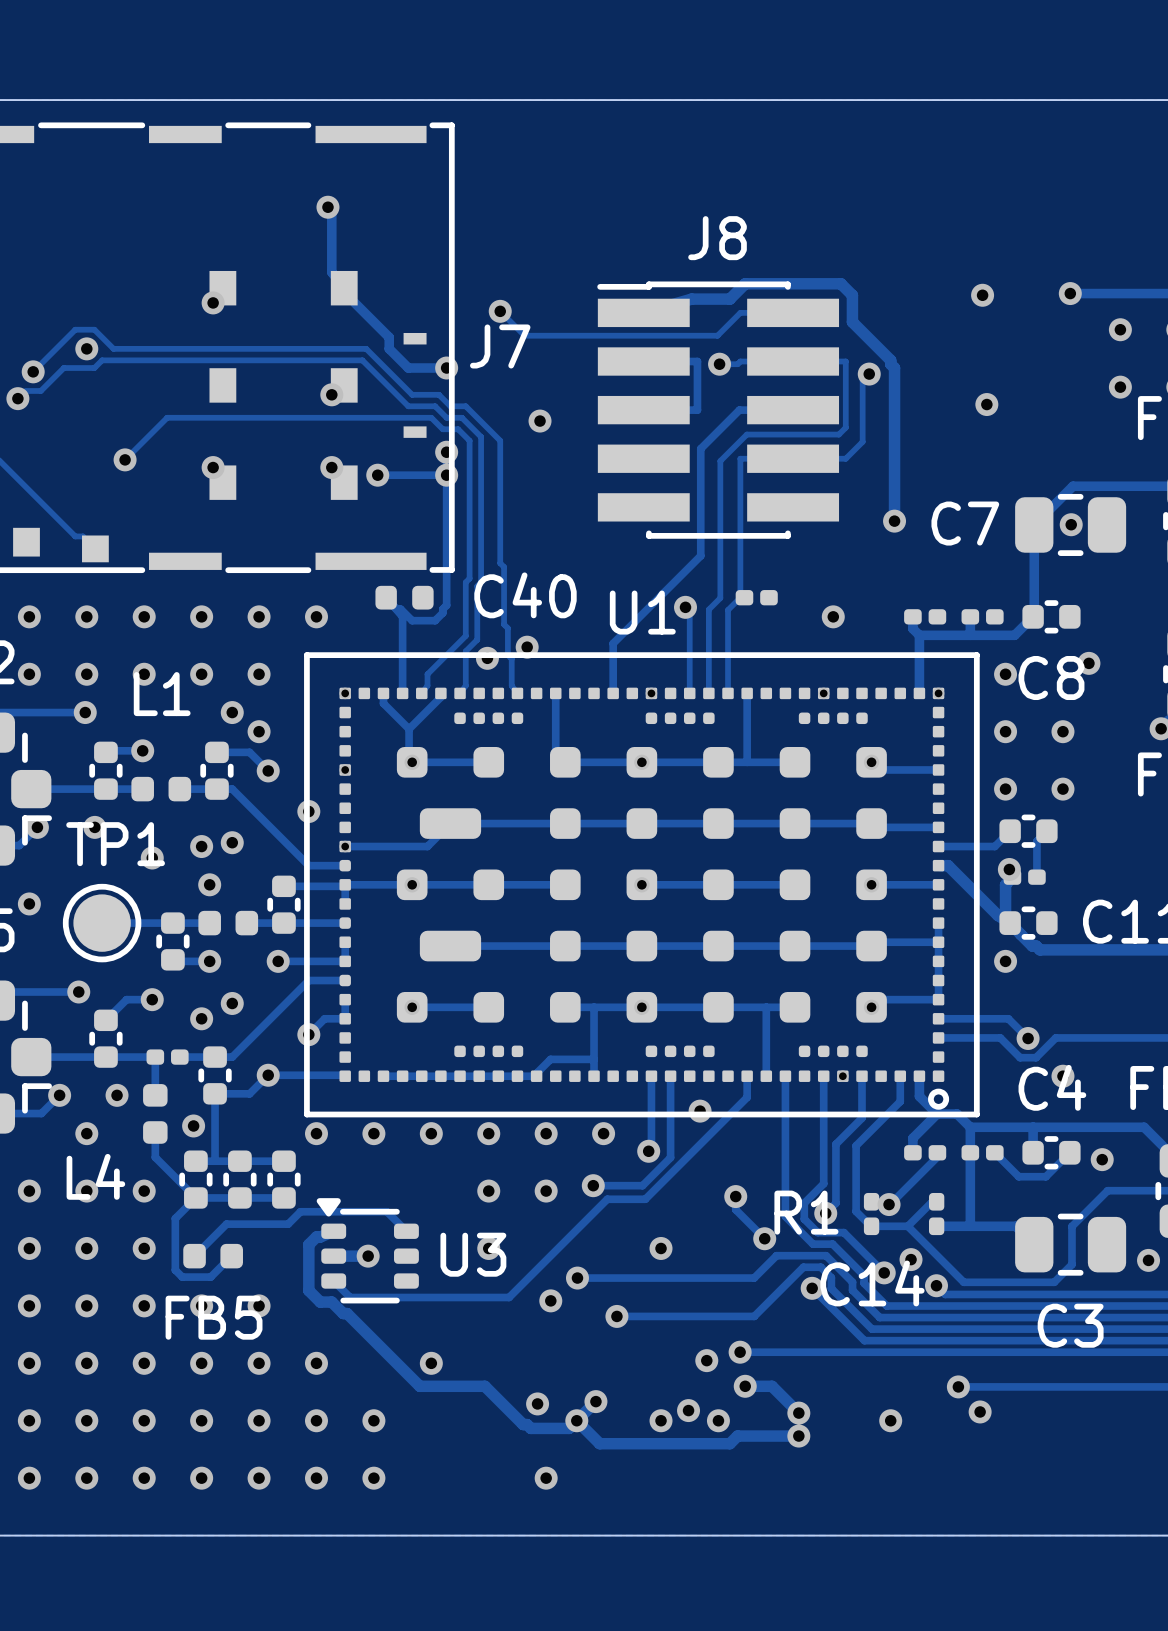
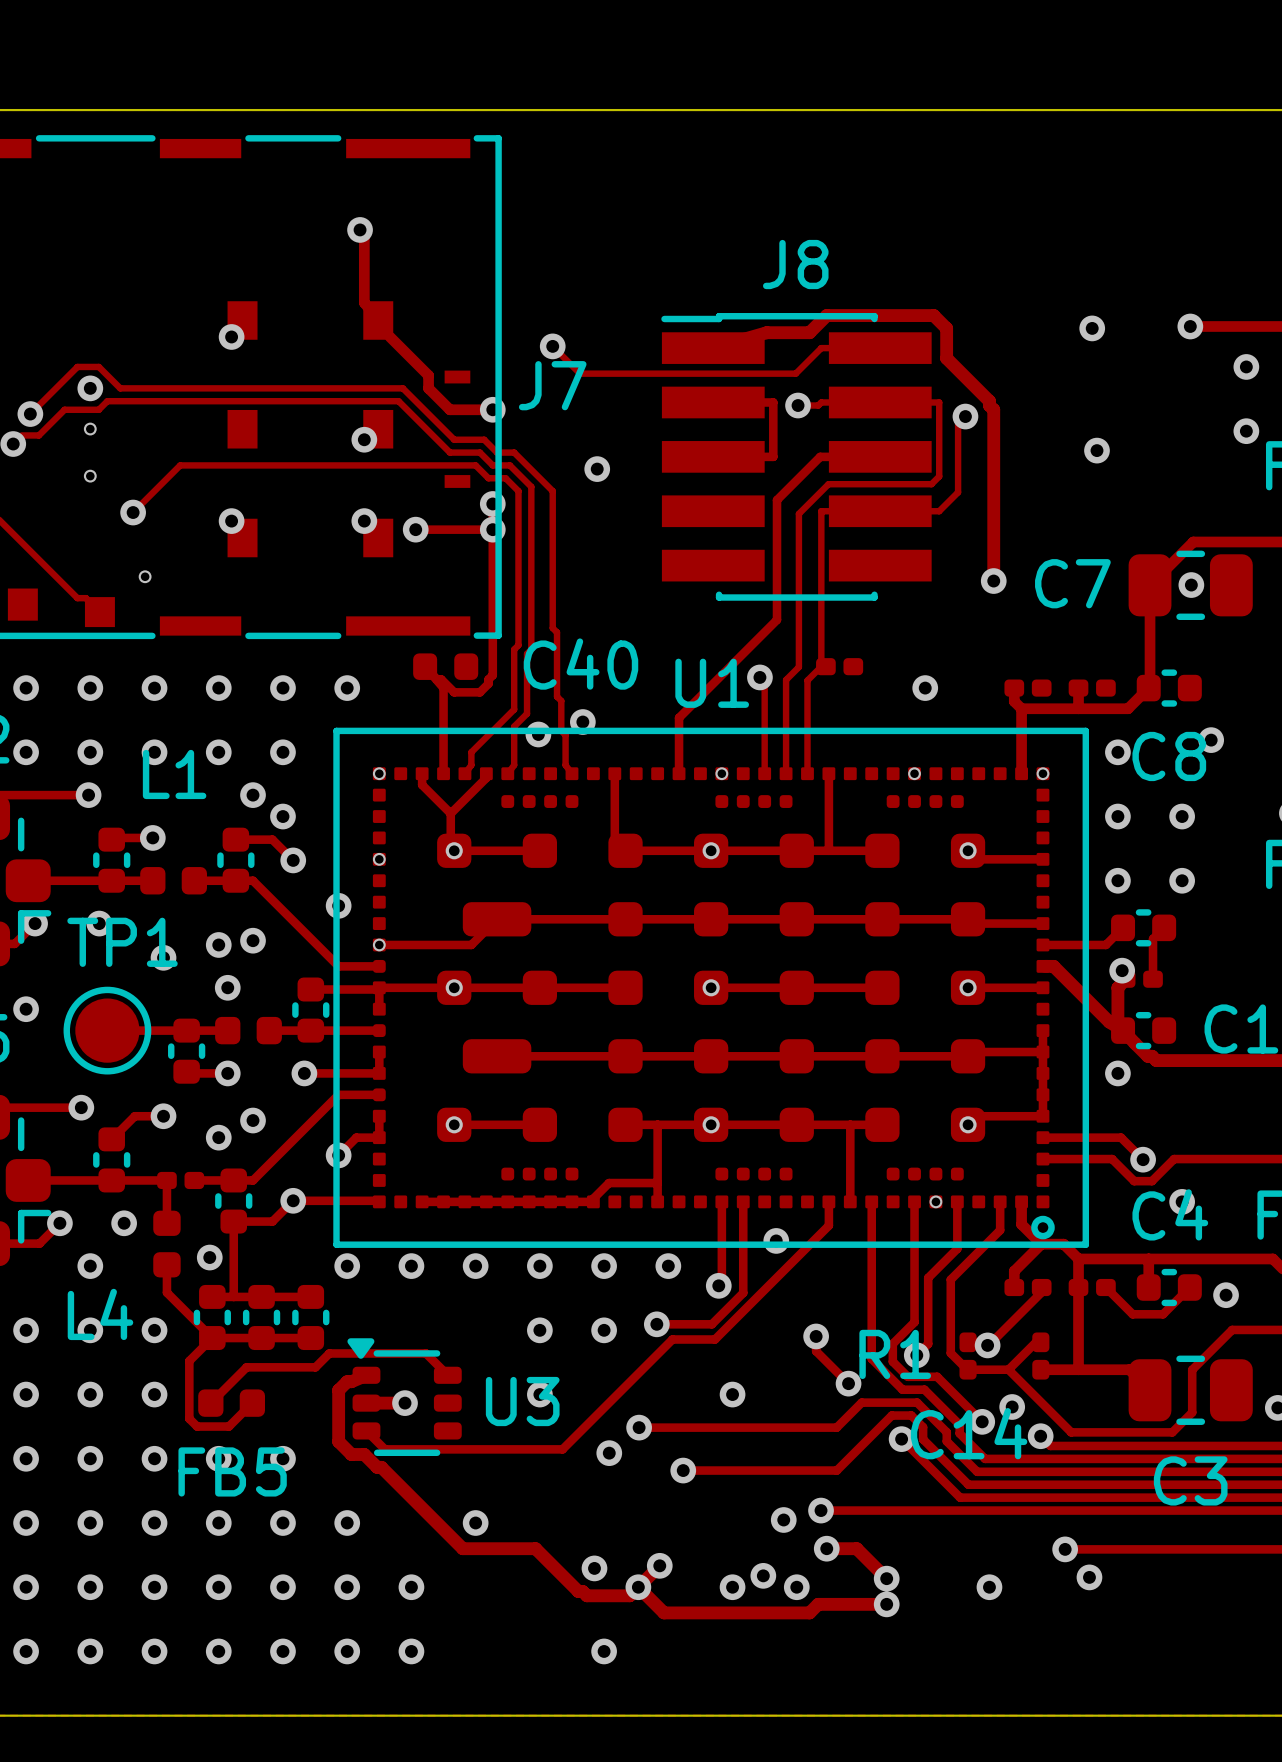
via: none -> (90, 429)
via: none -> (90, 476)
via: none -> (145, 576)

